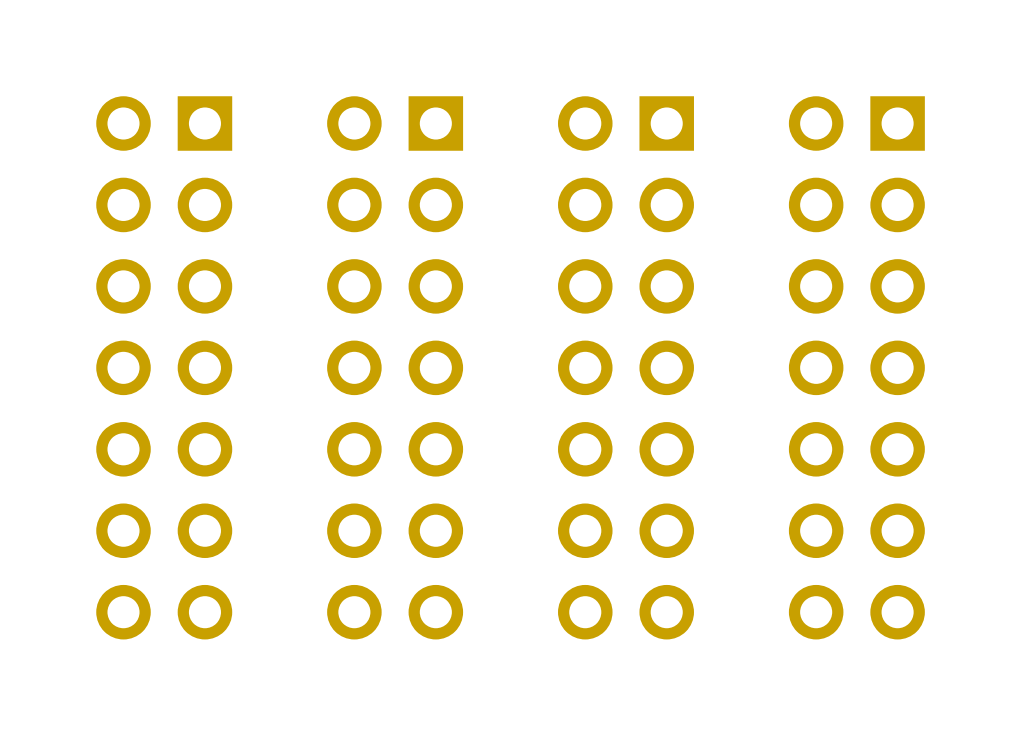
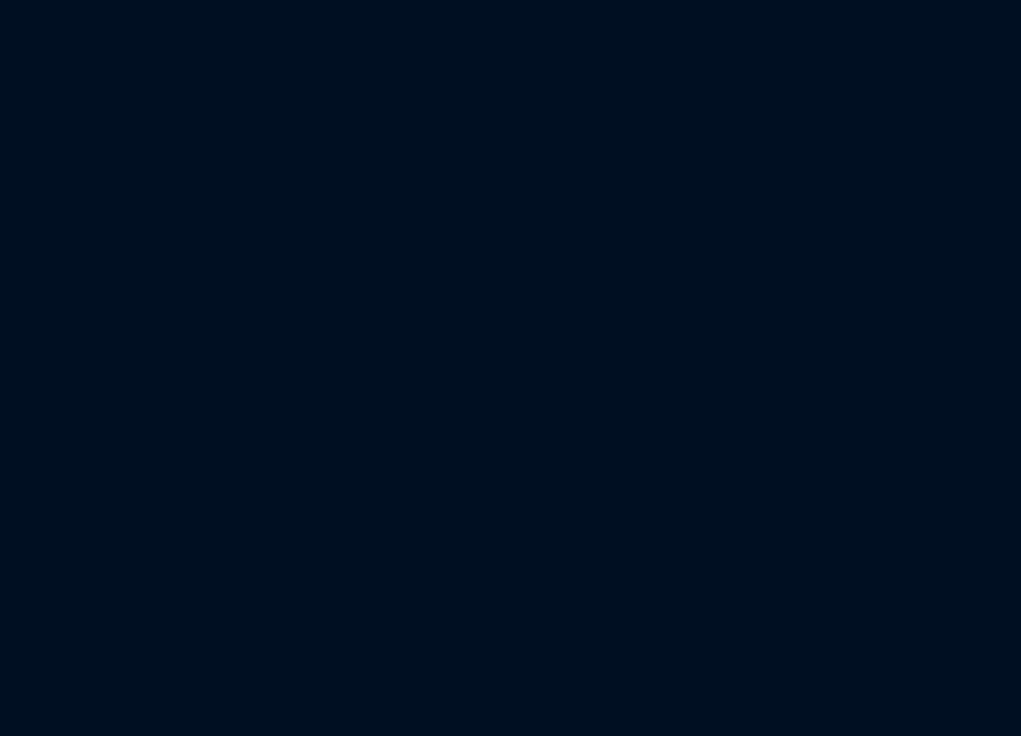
part: (164, 367) -> none
part: (395, 367) -> none
part: (625, 367) -> none
part: (856, 367) -> none

